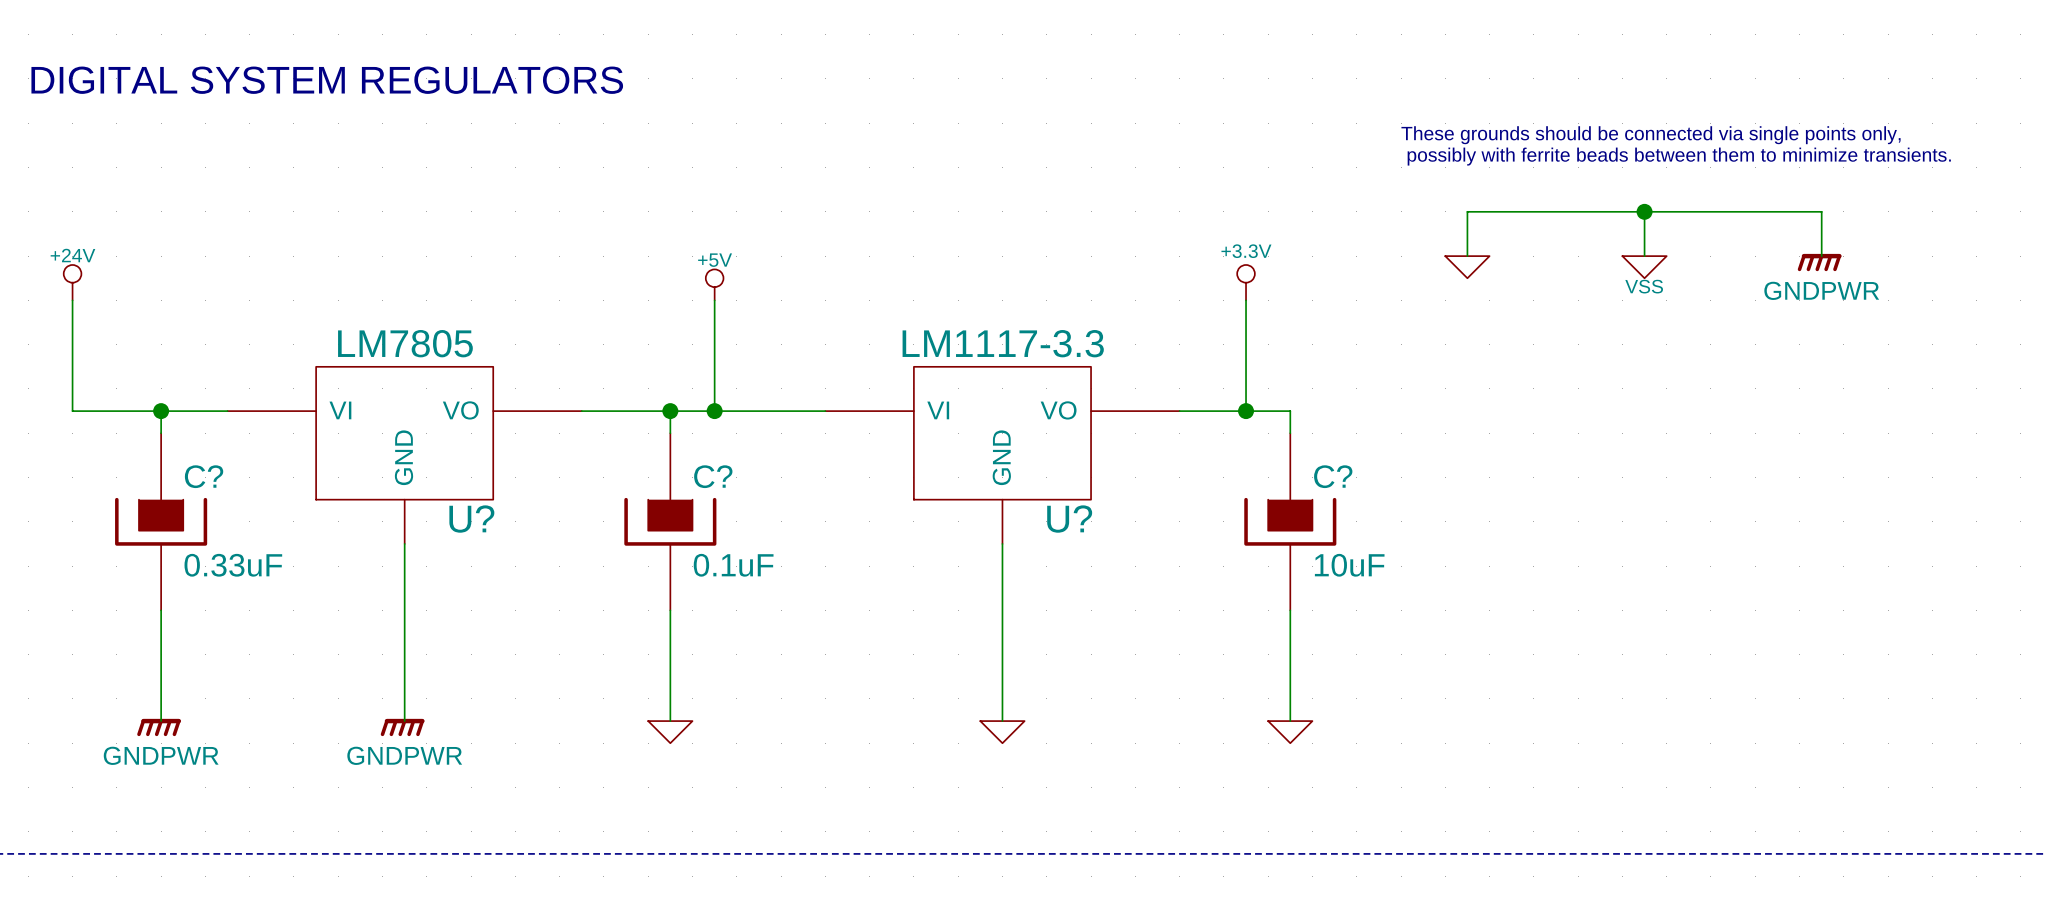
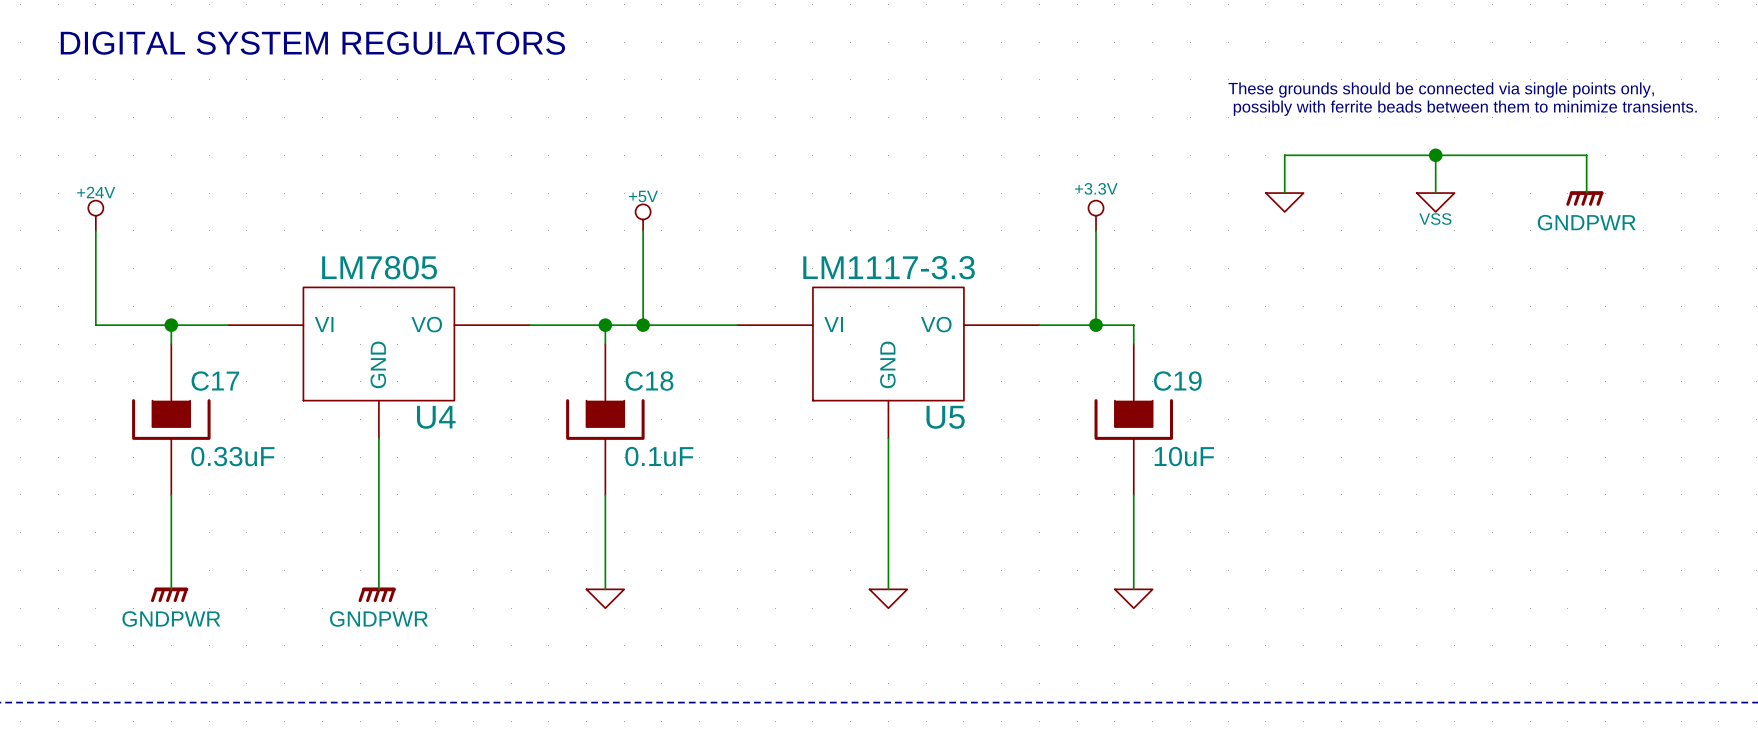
C? name: C? (204, 476) -> C17 (215, 381)
C? name: C? (713, 476) -> C18 (649, 381)
C? name: C? (1333, 476) -> C19 (1177, 381)
U? name: U? (471, 519) -> U4 (436, 417)
U? name: U? (1069, 519) -> U5 (945, 417)

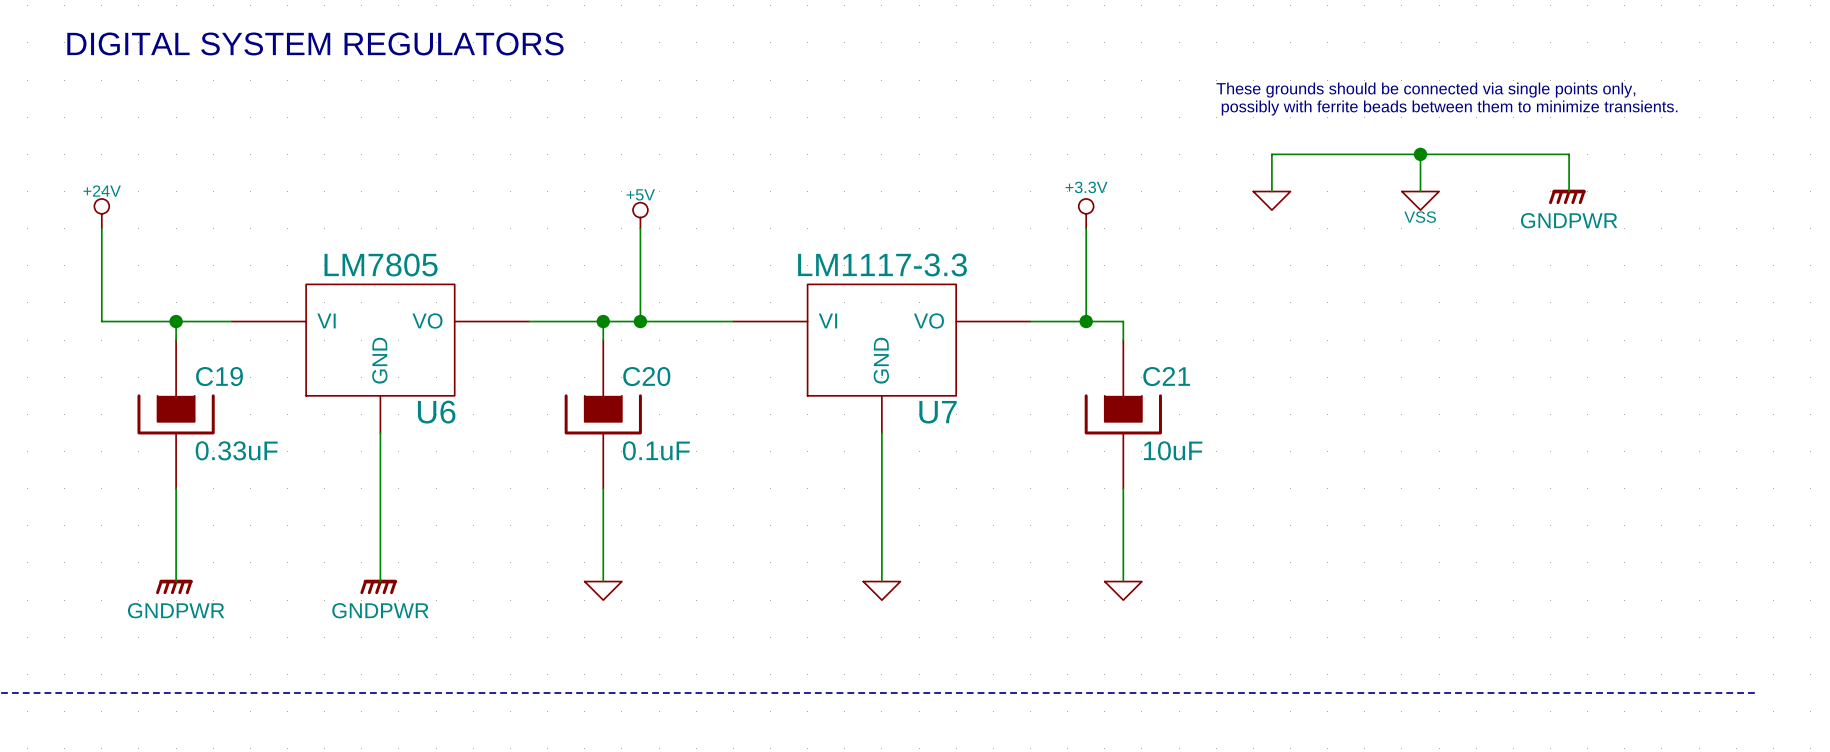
C17 name: C17 (215, 381) -> C19 (219, 376)
C18 name: C18 (649, 381) -> C20 (646, 376)
C19 name: C19 (1177, 381) -> C21 (1166, 376)
U4 name: U4 (436, 417) -> U6 (436, 412)
U5 name: U5 (945, 417) -> U7 (938, 412)

